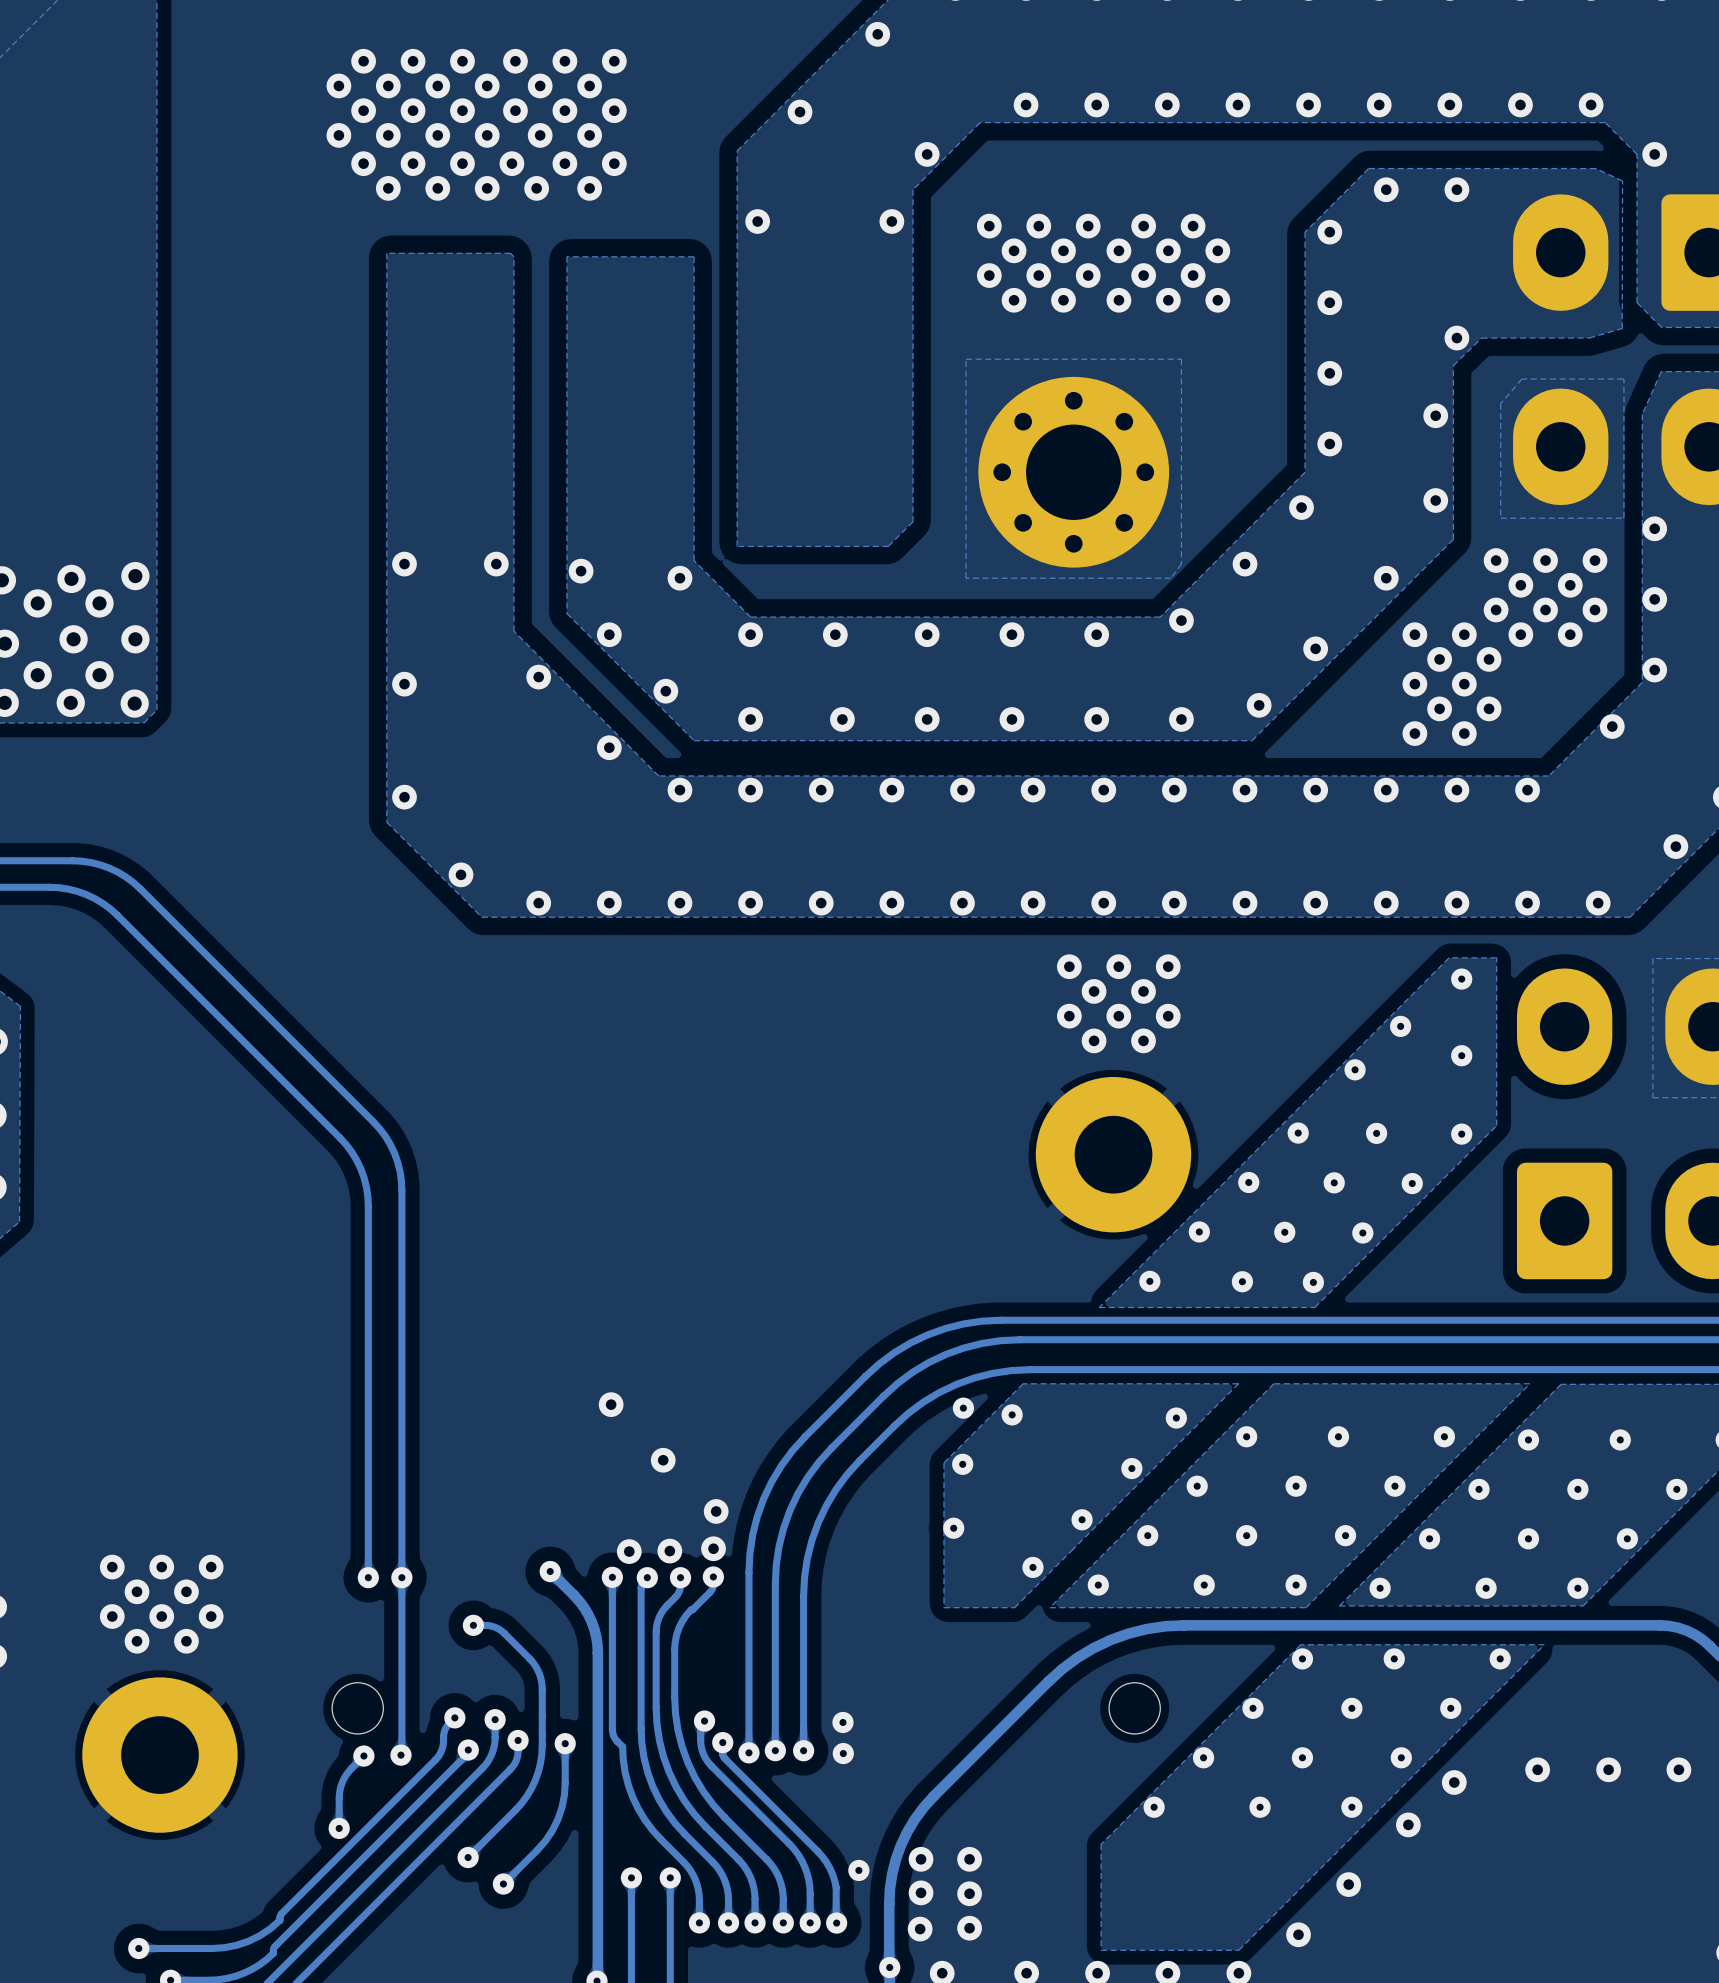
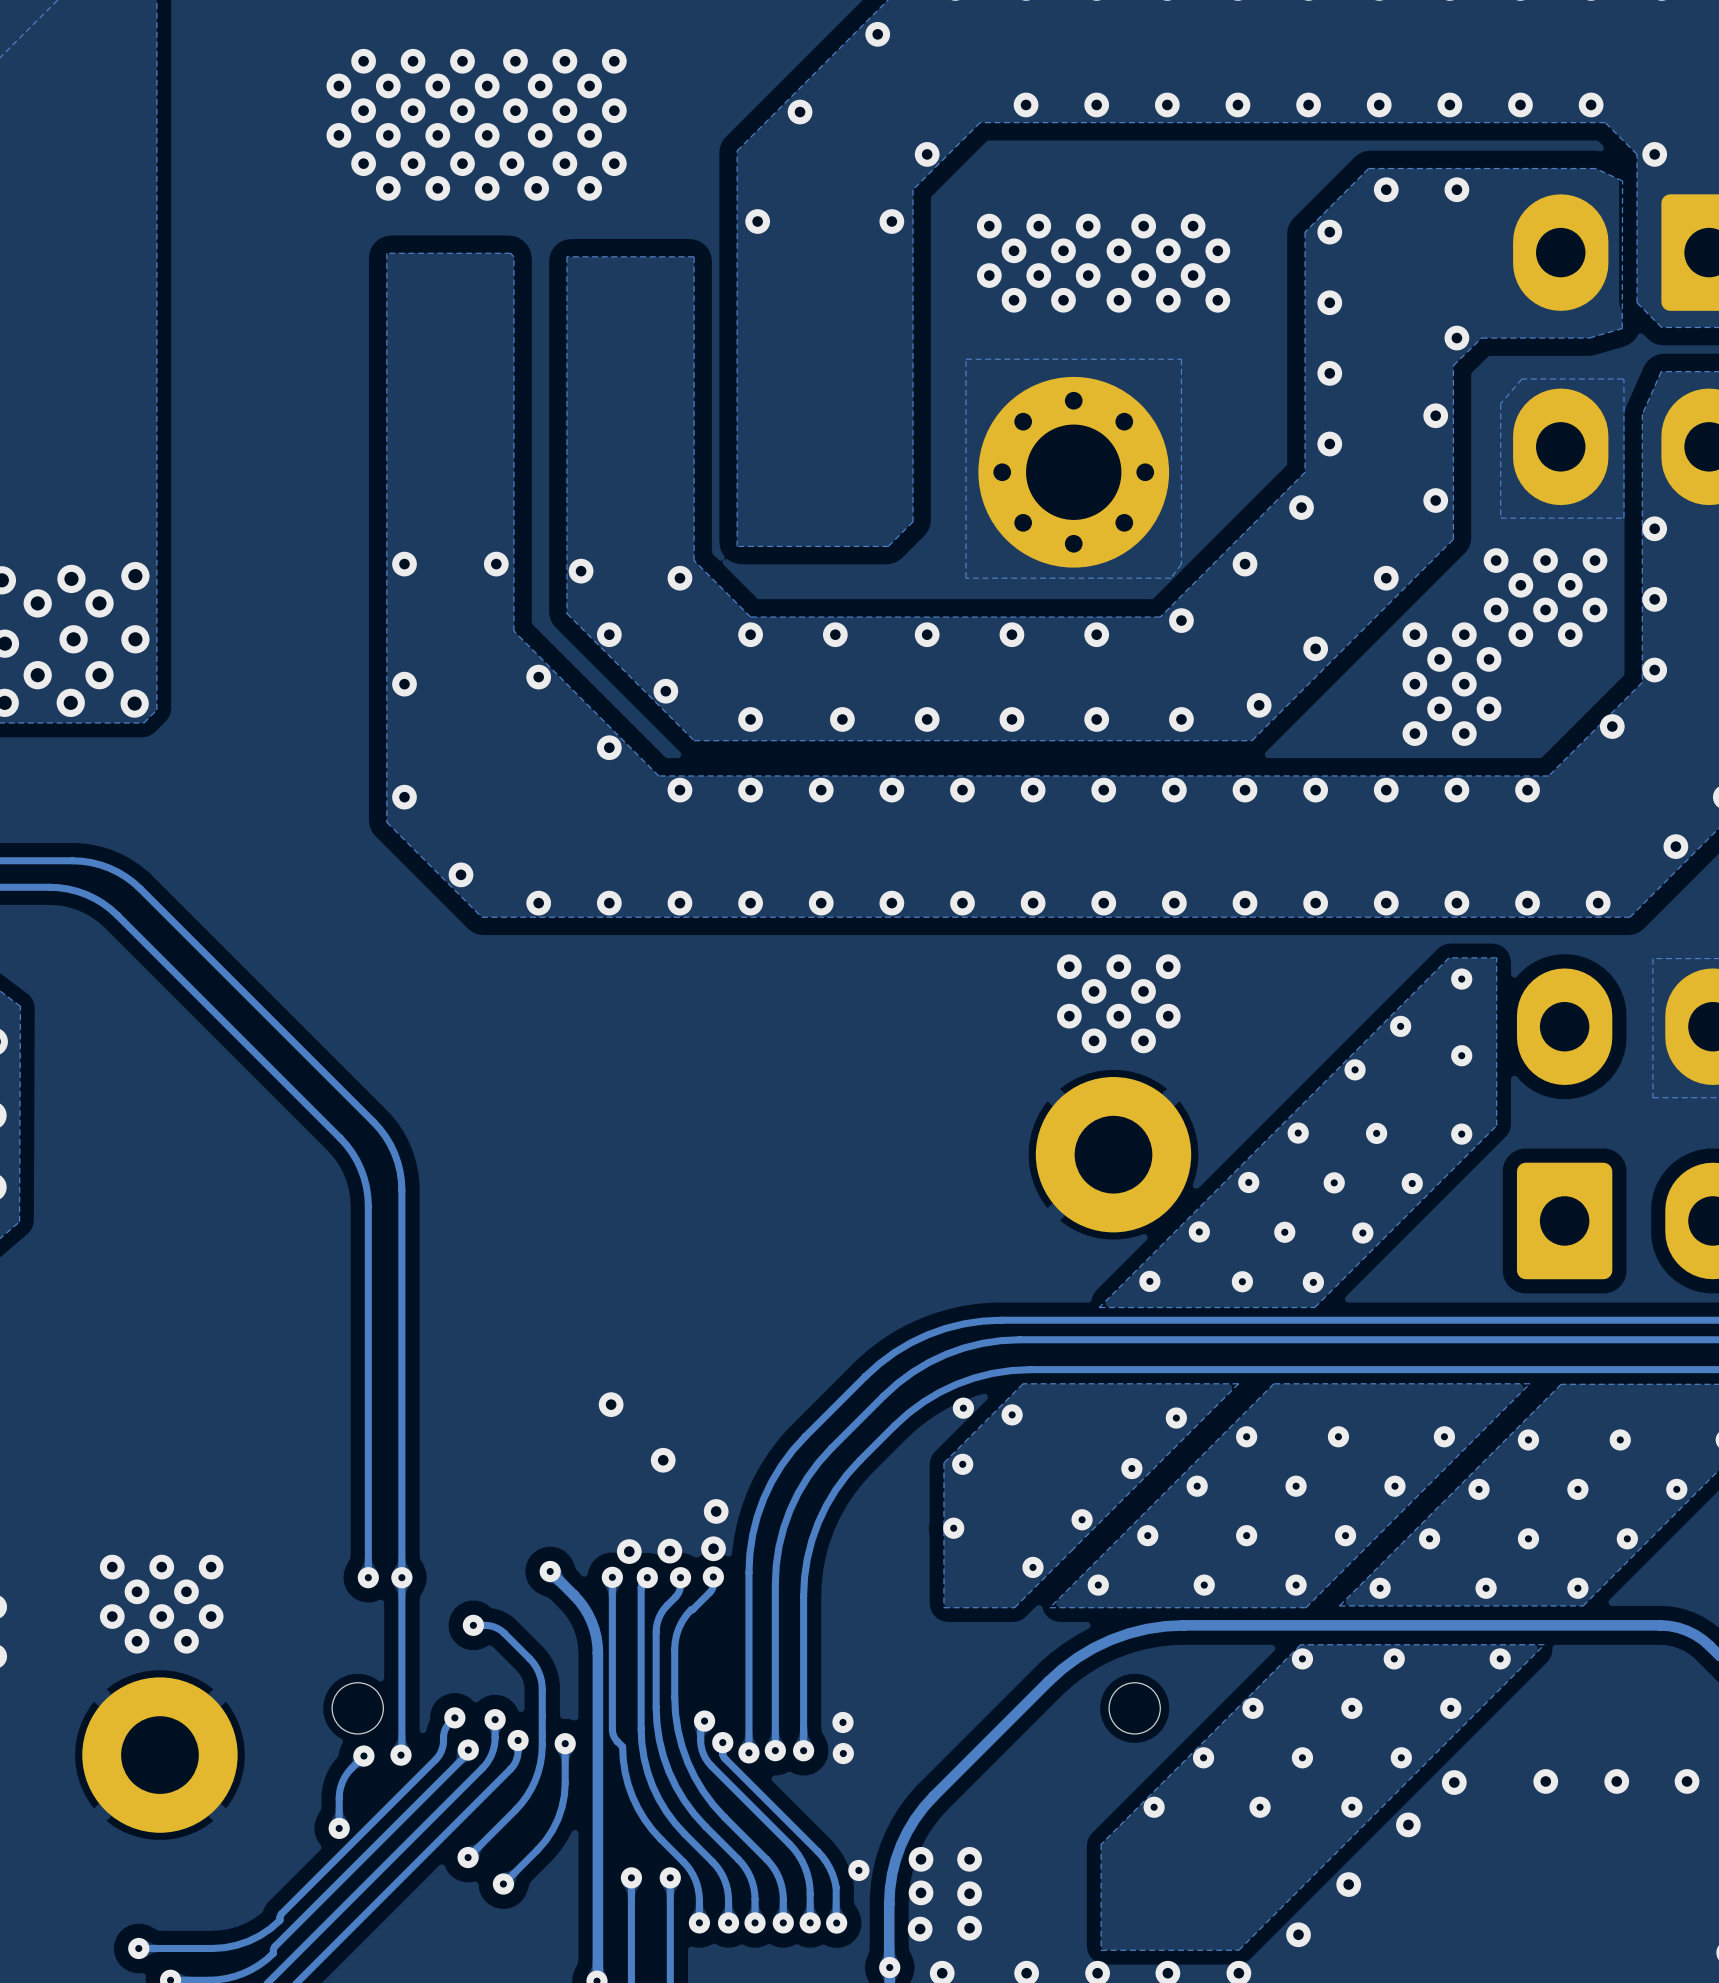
via position: (1537, 1769) -> (1545, 1781)
via position: (1608, 1769) -> (1616, 1781)
via position: (1678, 1769) -> (1687, 1781)

